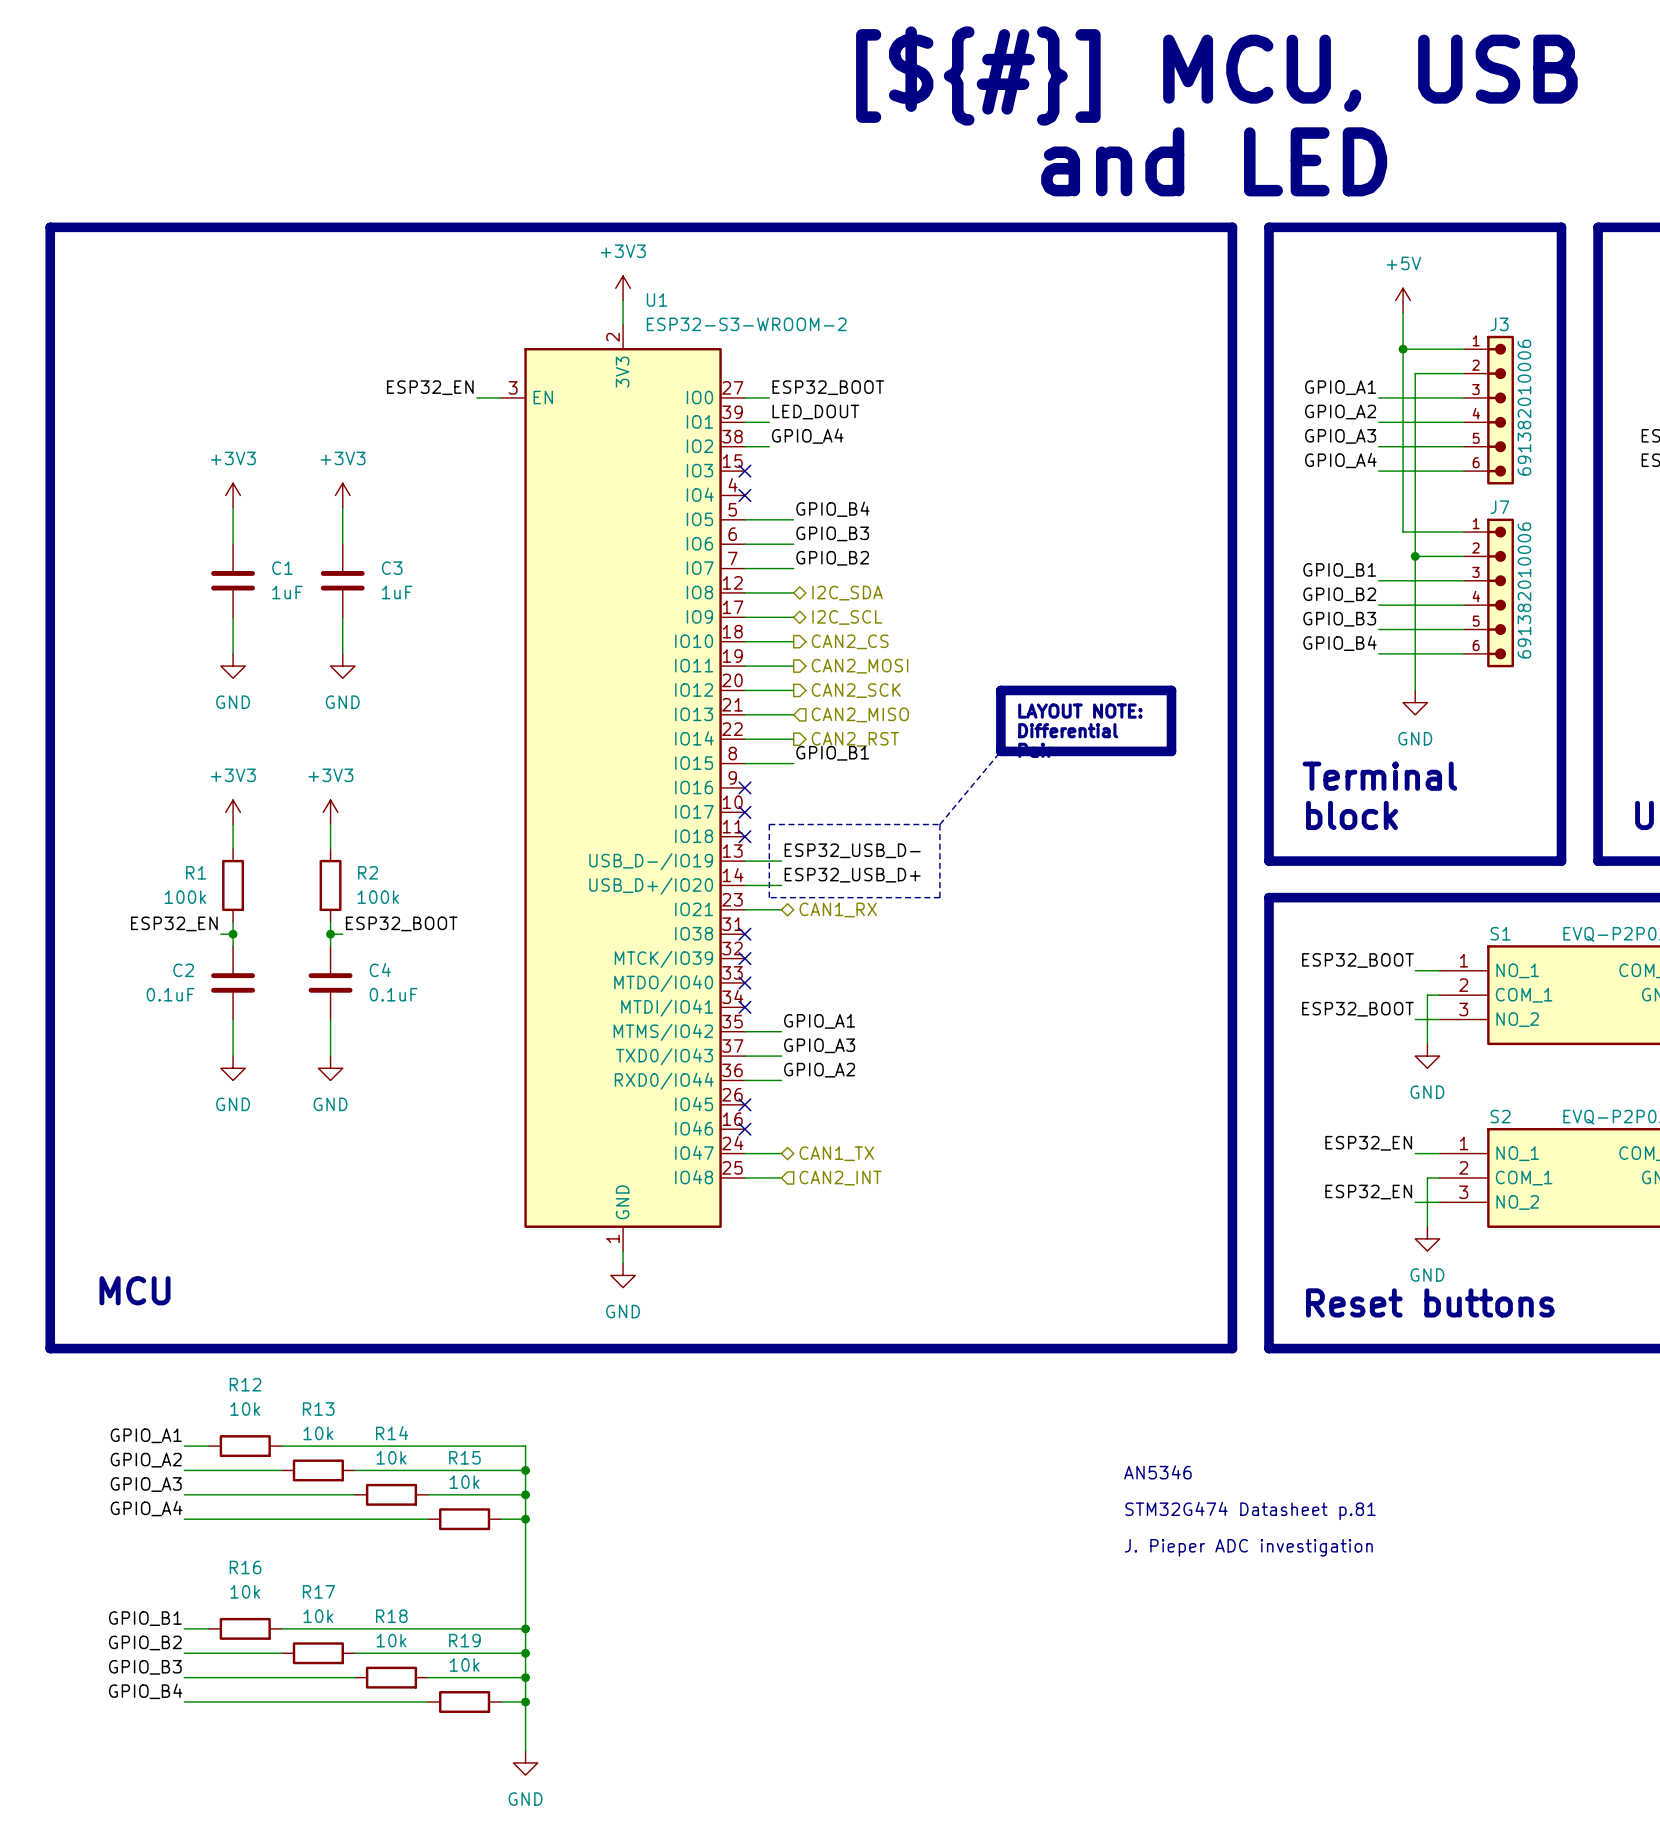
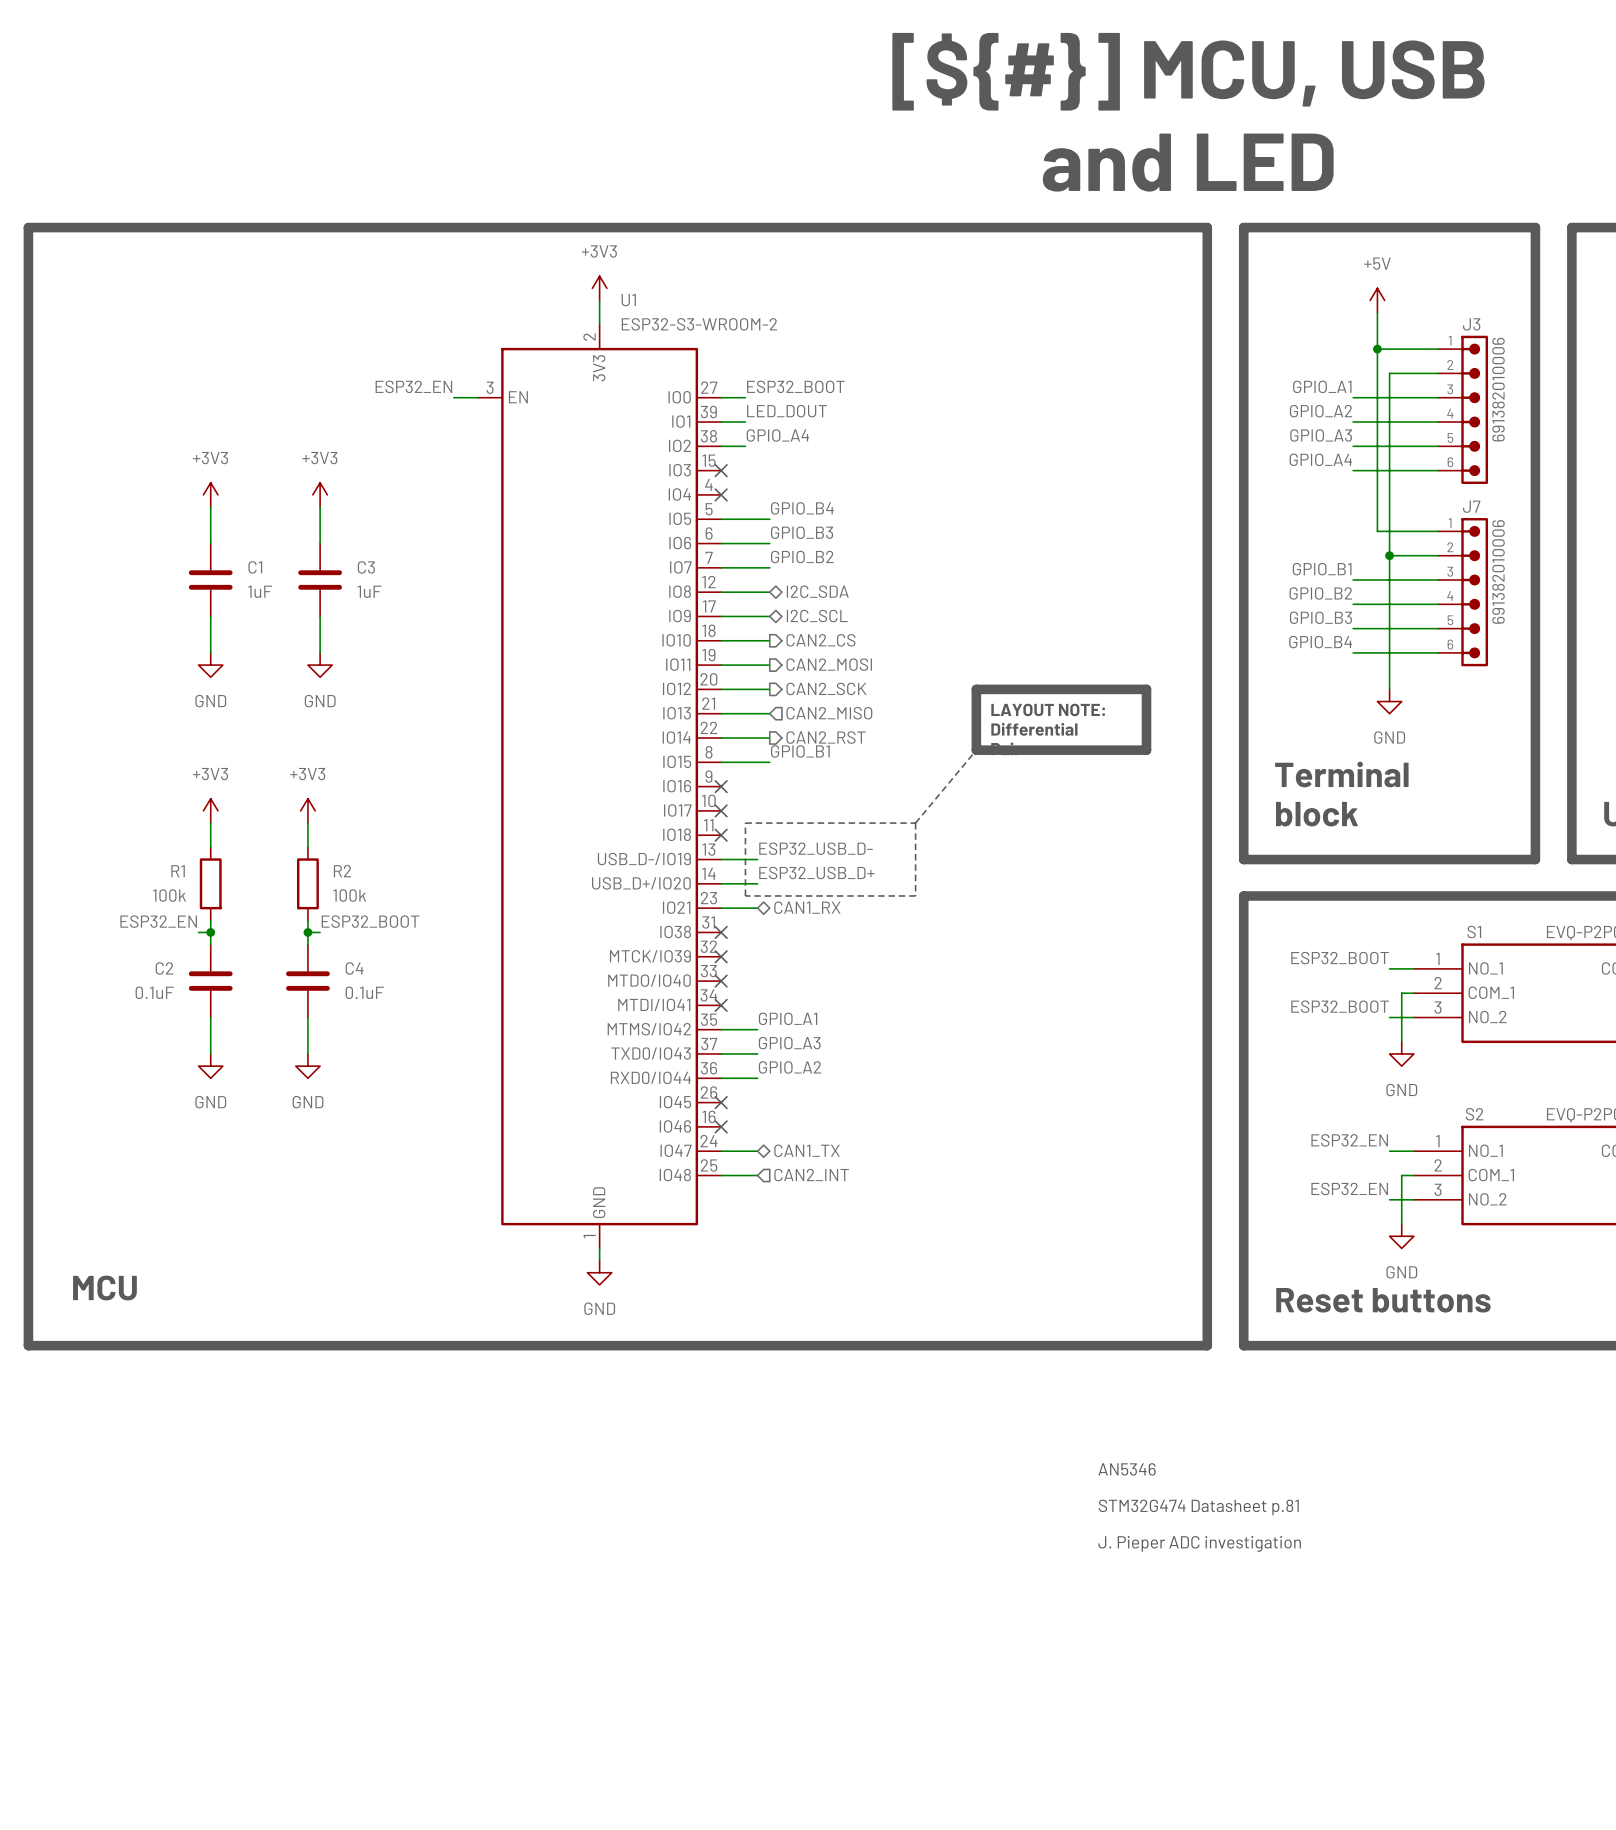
label: GPIO_A1 (146, 1435) -> none
wire: (184, 1446) (208, 1446) -> none
R12: 10k (245, 1446) -> none
wire: (281, 1446) (525, 1446) (525, 1750) -> none
label: GPIO_A2 (146, 1460) -> none
wire: (184, 1470) (281, 1470) -> none
R13: 10k (318, 1470) -> none
wire: (354, 1470) (525, 1470) -> none
junction: (525, 1470) -> none
label: GPIO_A3 (146, 1484) -> none
wire: (184, 1494) (354, 1494) -> none
R14: 10k (391, 1494) -> none
wire: (428, 1494) (525, 1494) -> none
junction: (525, 1494) -> none
label: GPIO_A4 (146, 1508) -> none
wire: (184, 1519) (428, 1519) -> none
R15: 10k (464, 1519) -> none
wire: (501, 1519) (525, 1519) -> none
junction: (525, 1519) -> none
label: GPIO_B1 (145, 1618) -> none
wire: (184, 1628) (208, 1628) -> none
R16: 10k (245, 1628) -> none
wire: (281, 1628) (525, 1628) -> none
junction: (525, 1628) -> none
label: GPIO_B2 (145, 1642) -> none
wire: (184, 1653) (281, 1653) -> none
R17: 10k (318, 1653) -> none
wire: (354, 1653) (525, 1653) -> none
junction: (525, 1653) -> none
label: GPIO_B3 (145, 1667) -> none
wire: (184, 1677) (354, 1677) -> none
R18: 10k (391, 1677) -> none
wire: (428, 1677) (525, 1677) -> none
junction: (525, 1677) -> none
label: GPIO_B4 (145, 1691) -> none
wire: (184, 1702) (428, 1702) -> none
R19: 10k (464, 1702) -> none
wire: (501, 1702) (525, 1702) -> none
junction: (525, 1702) -> none
power symbol: GND (525, 1762) -> none

